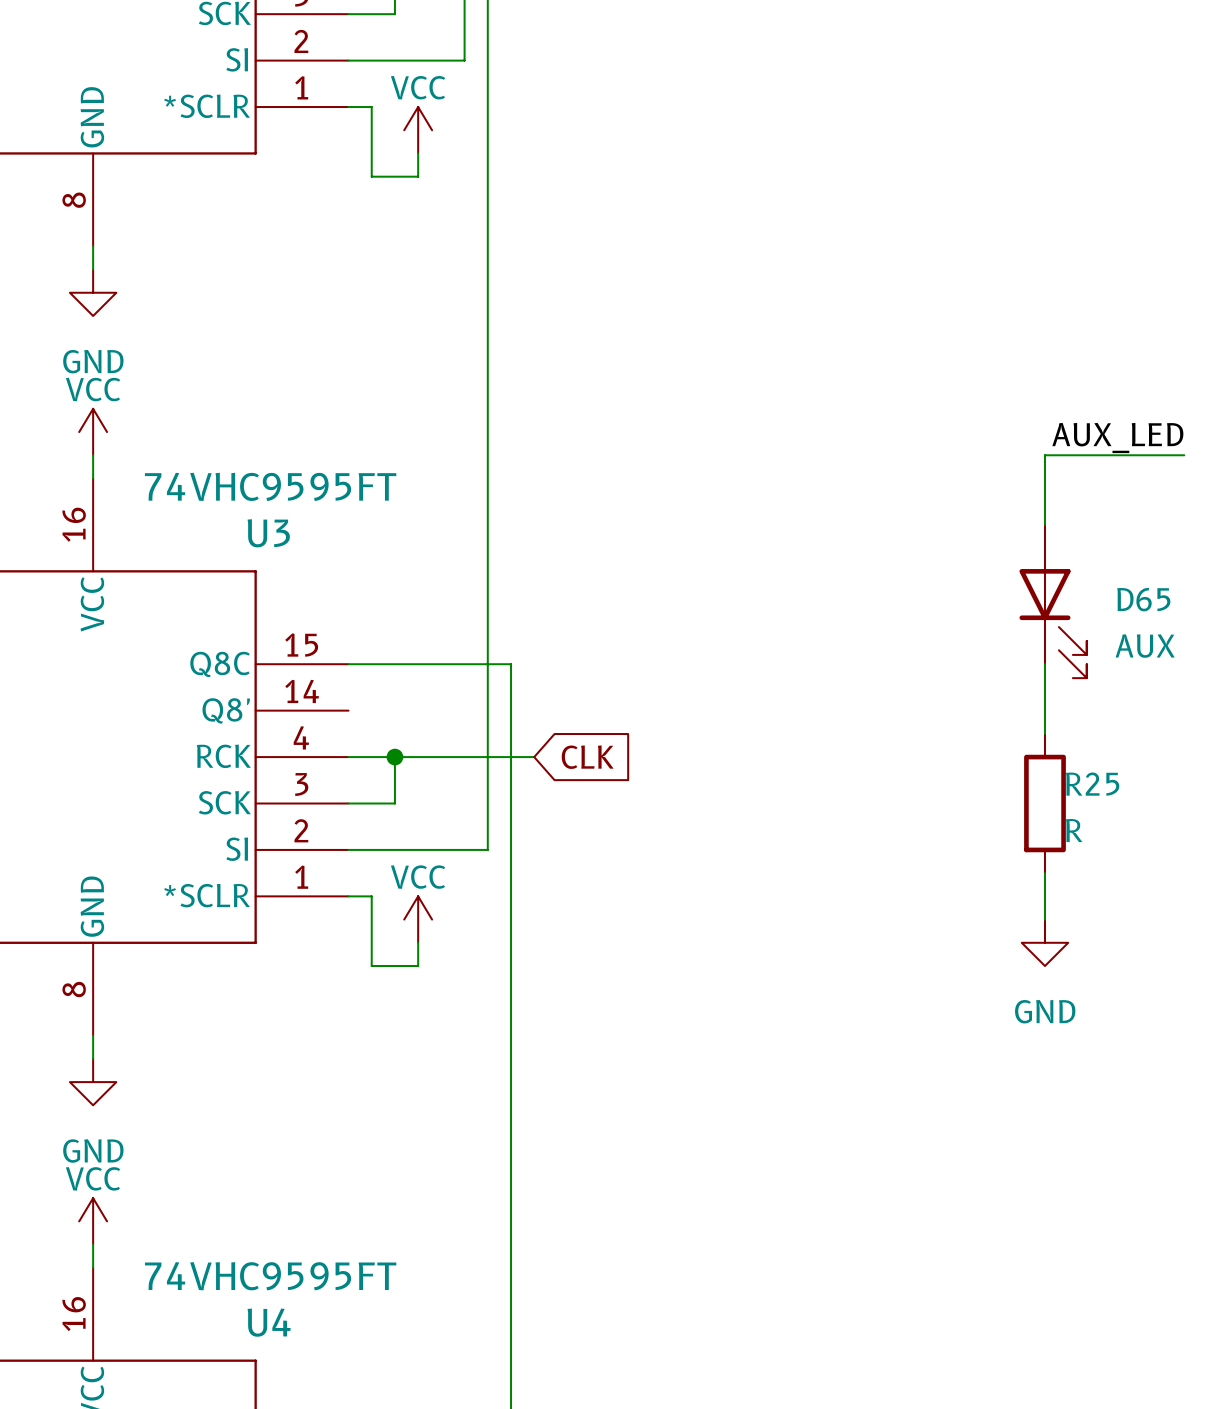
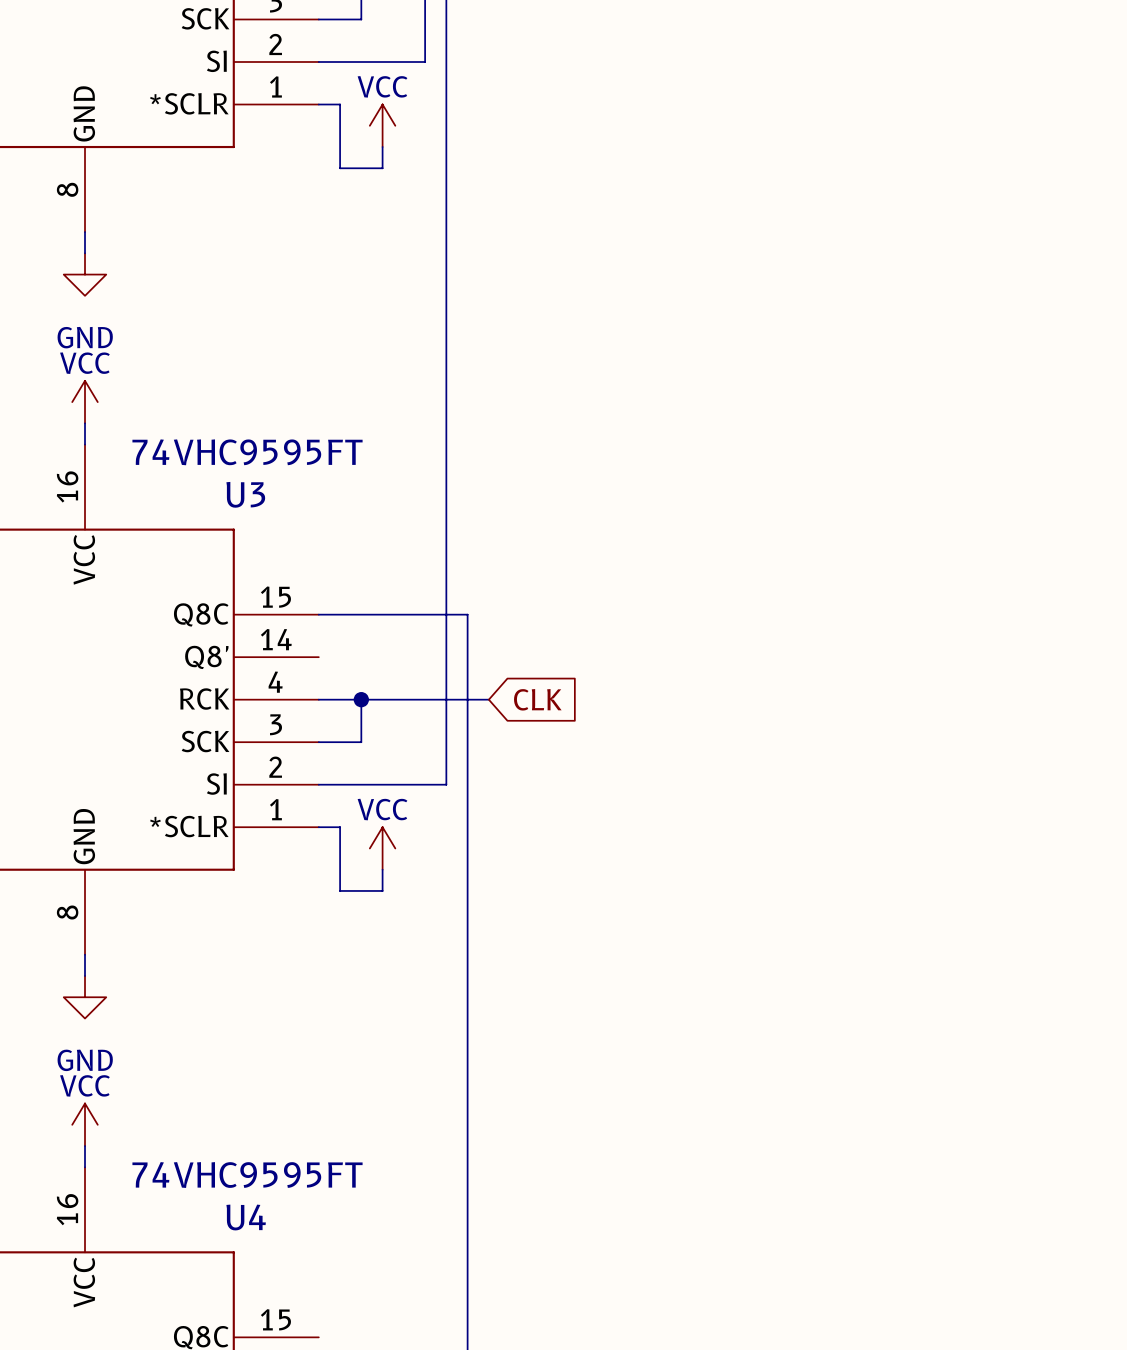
label: AUX_LED (1117, 438) -> none
wire: (1184, 455) (1044, 455) (1044, 524) -> none
D65: AUX (1053, 601) -> none
wire: (1044, 664) (1044, 733) -> none
R25: R (1044, 803) -> none
wire: (1044, 873) (1044, 919) -> none
power symbol: GND (1044, 942) -> none

